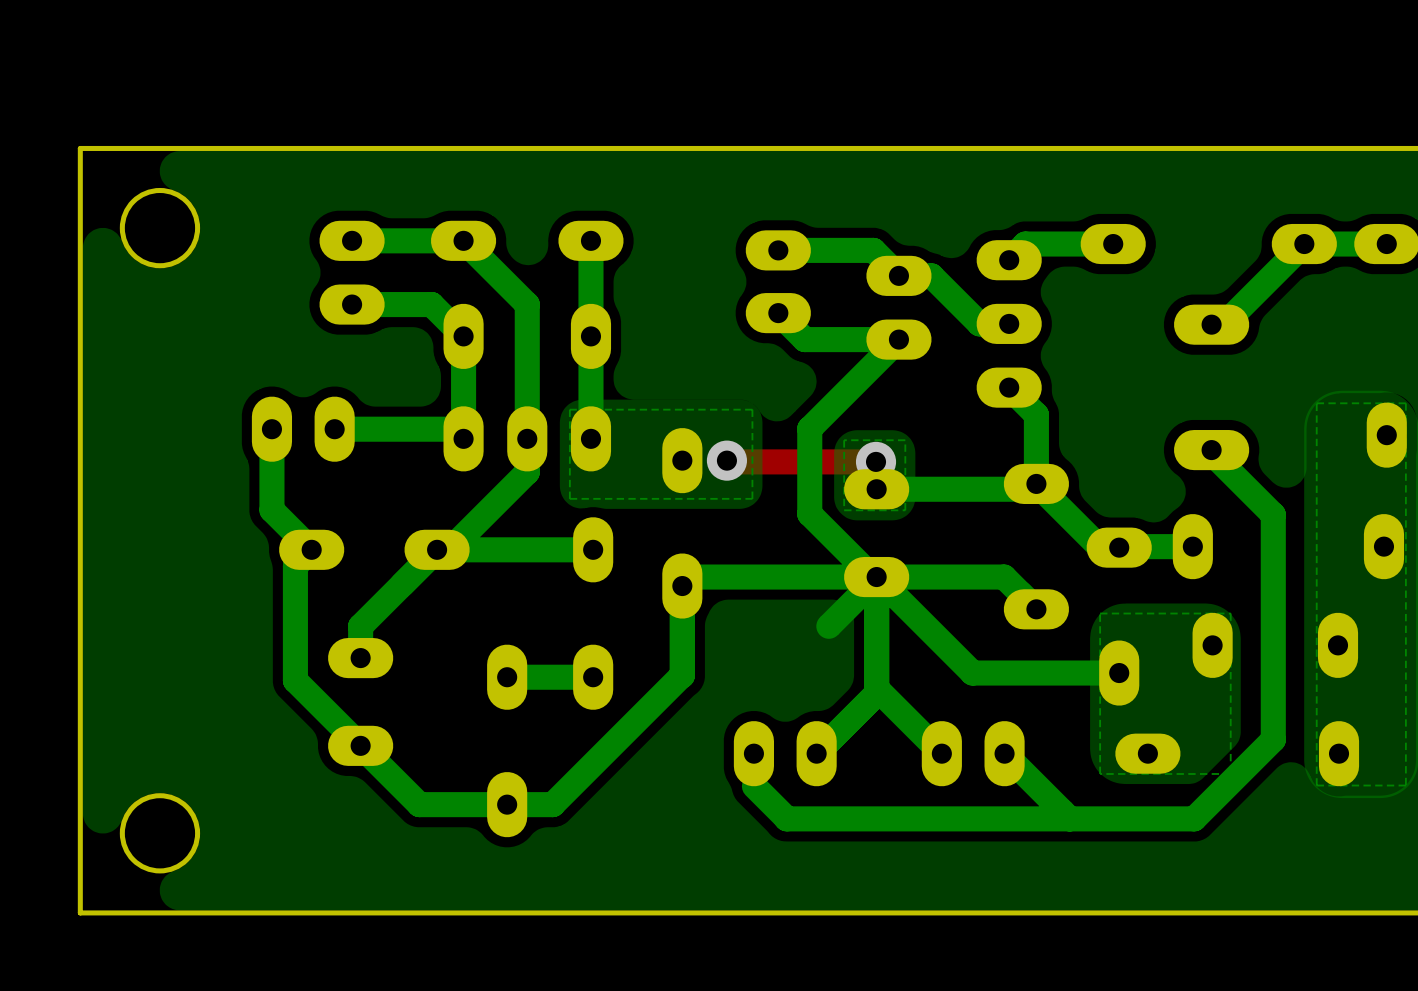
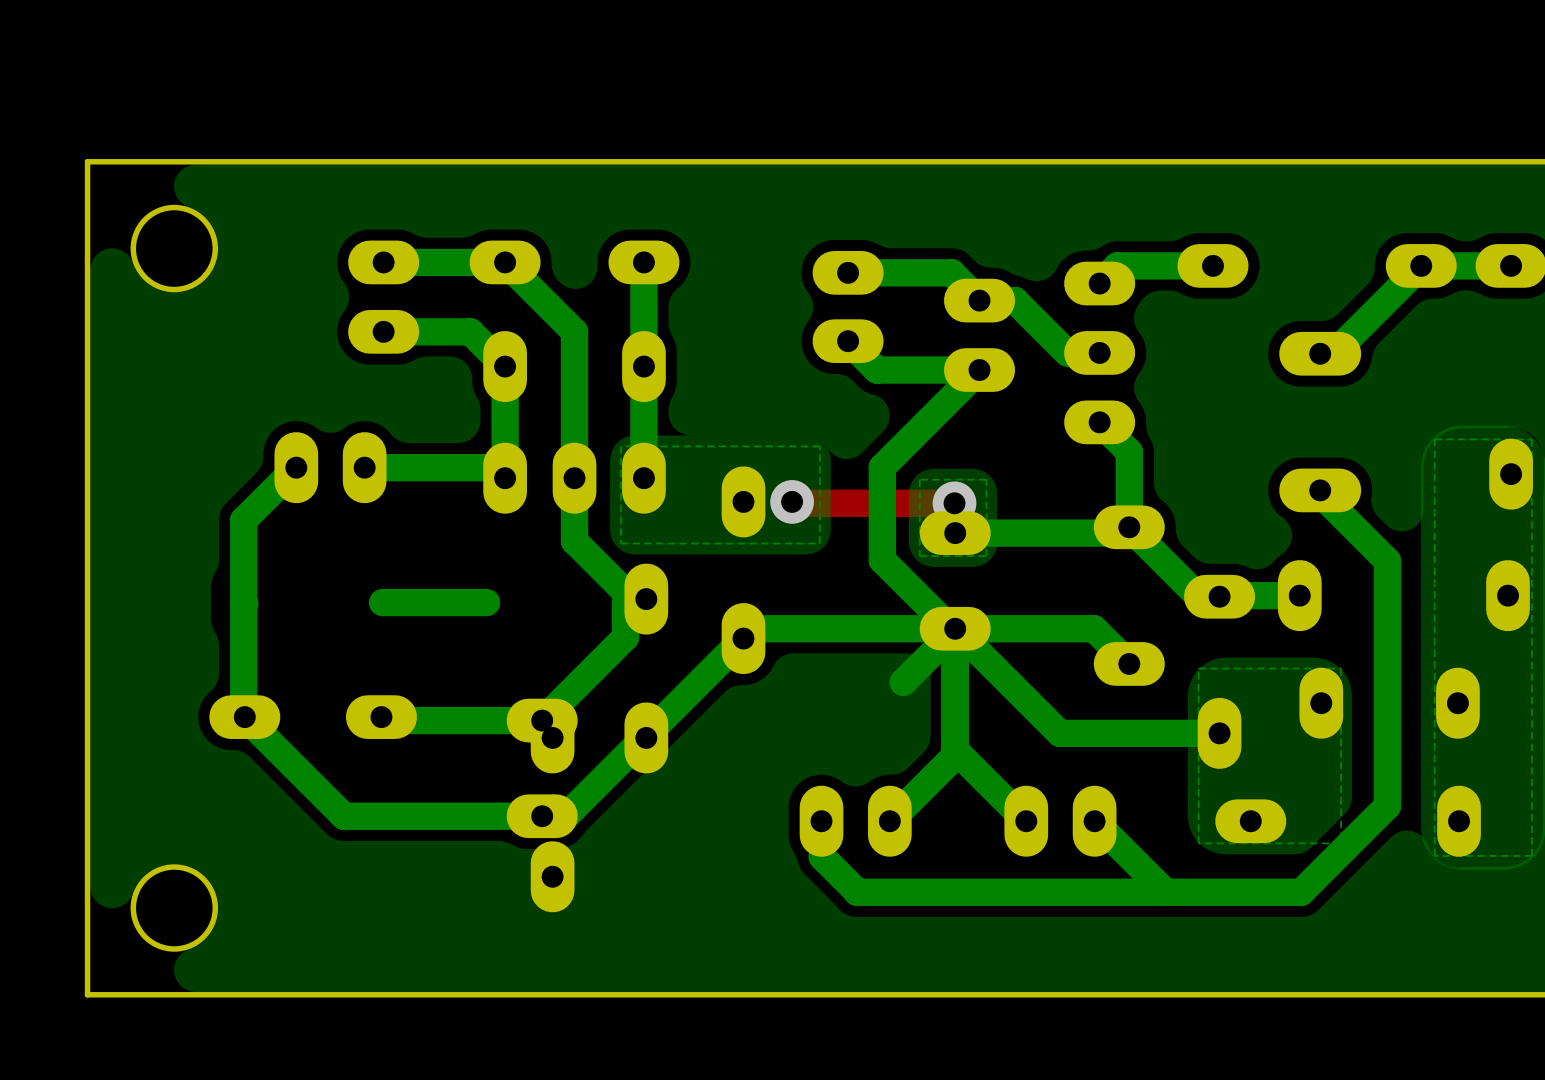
bottom track: (271, 429) (271, 510) (314, 552) -> (296, 467) (243, 520) (243, 716) (343, 816) (565, 816) (743, 638)
bottom track: (527, 472) (449, 549) -> (574, 514) (574, 541) (642, 609)
bottom track: (311, 549) (295, 566) (295, 680) (419, 804) (552, 804) (682, 675) -> none
part position: (374, 549) -> (313, 717)
bottom track: (437, 549) (360, 626) (360, 658) -> none
bottom track: (593, 549) (427, 549) -> none
bottom track: none -> (486, 602) (382, 602)
bottom track: none -> (625, 602) (625, 637) (542, 720) (384, 720) (381, 717)
bottom track: (593, 677) (507, 677) -> none
part position: (360, 701) -> (542, 768)

